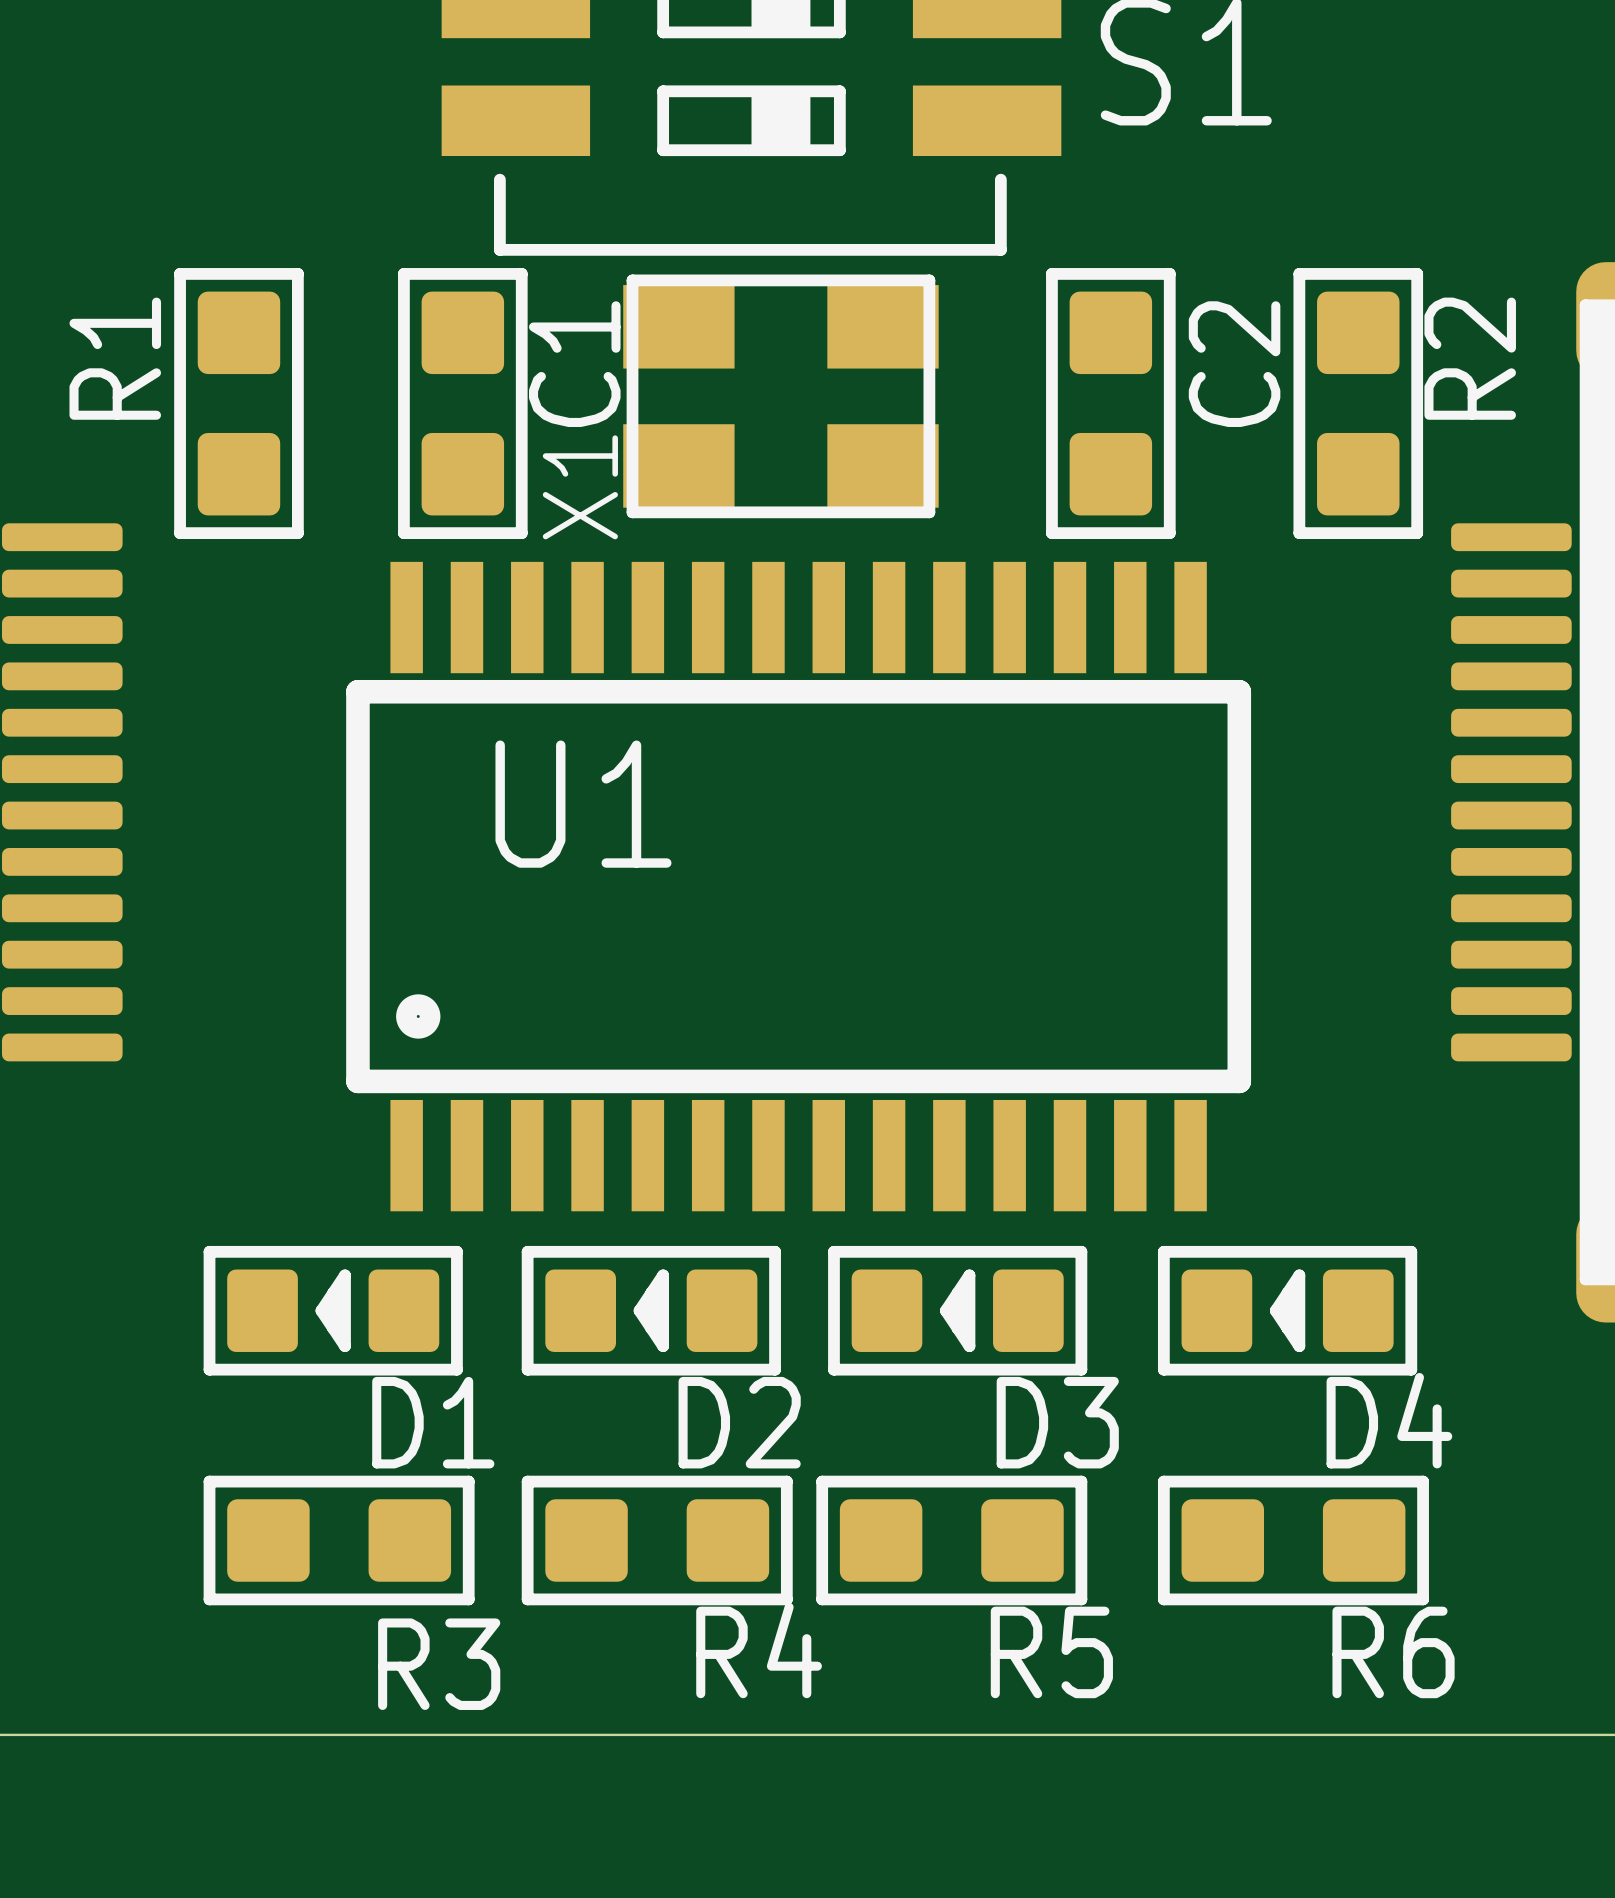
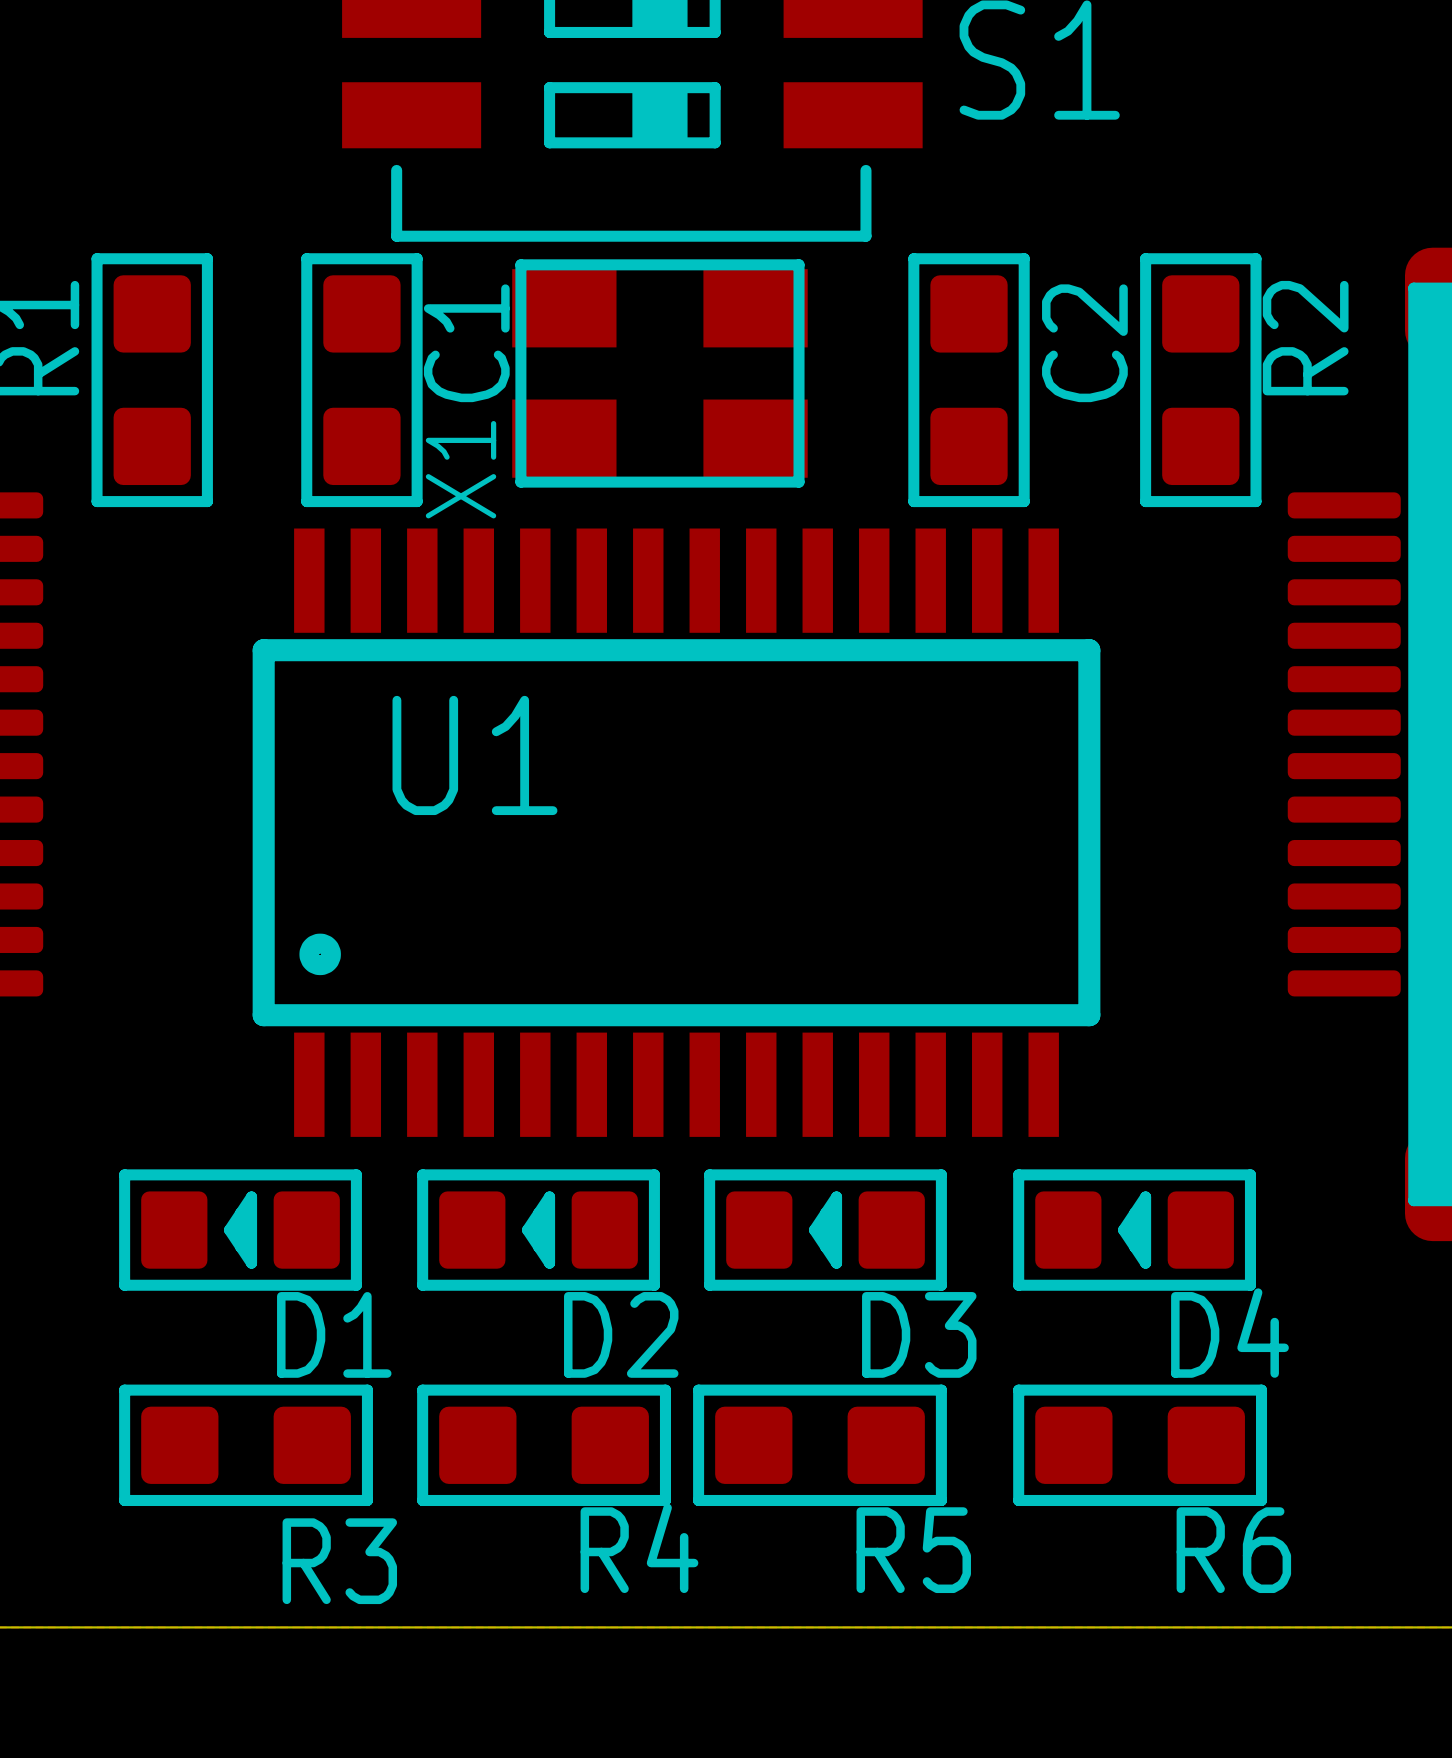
X1 name position: X1 (580, 487) -> X1 (461, 469)

